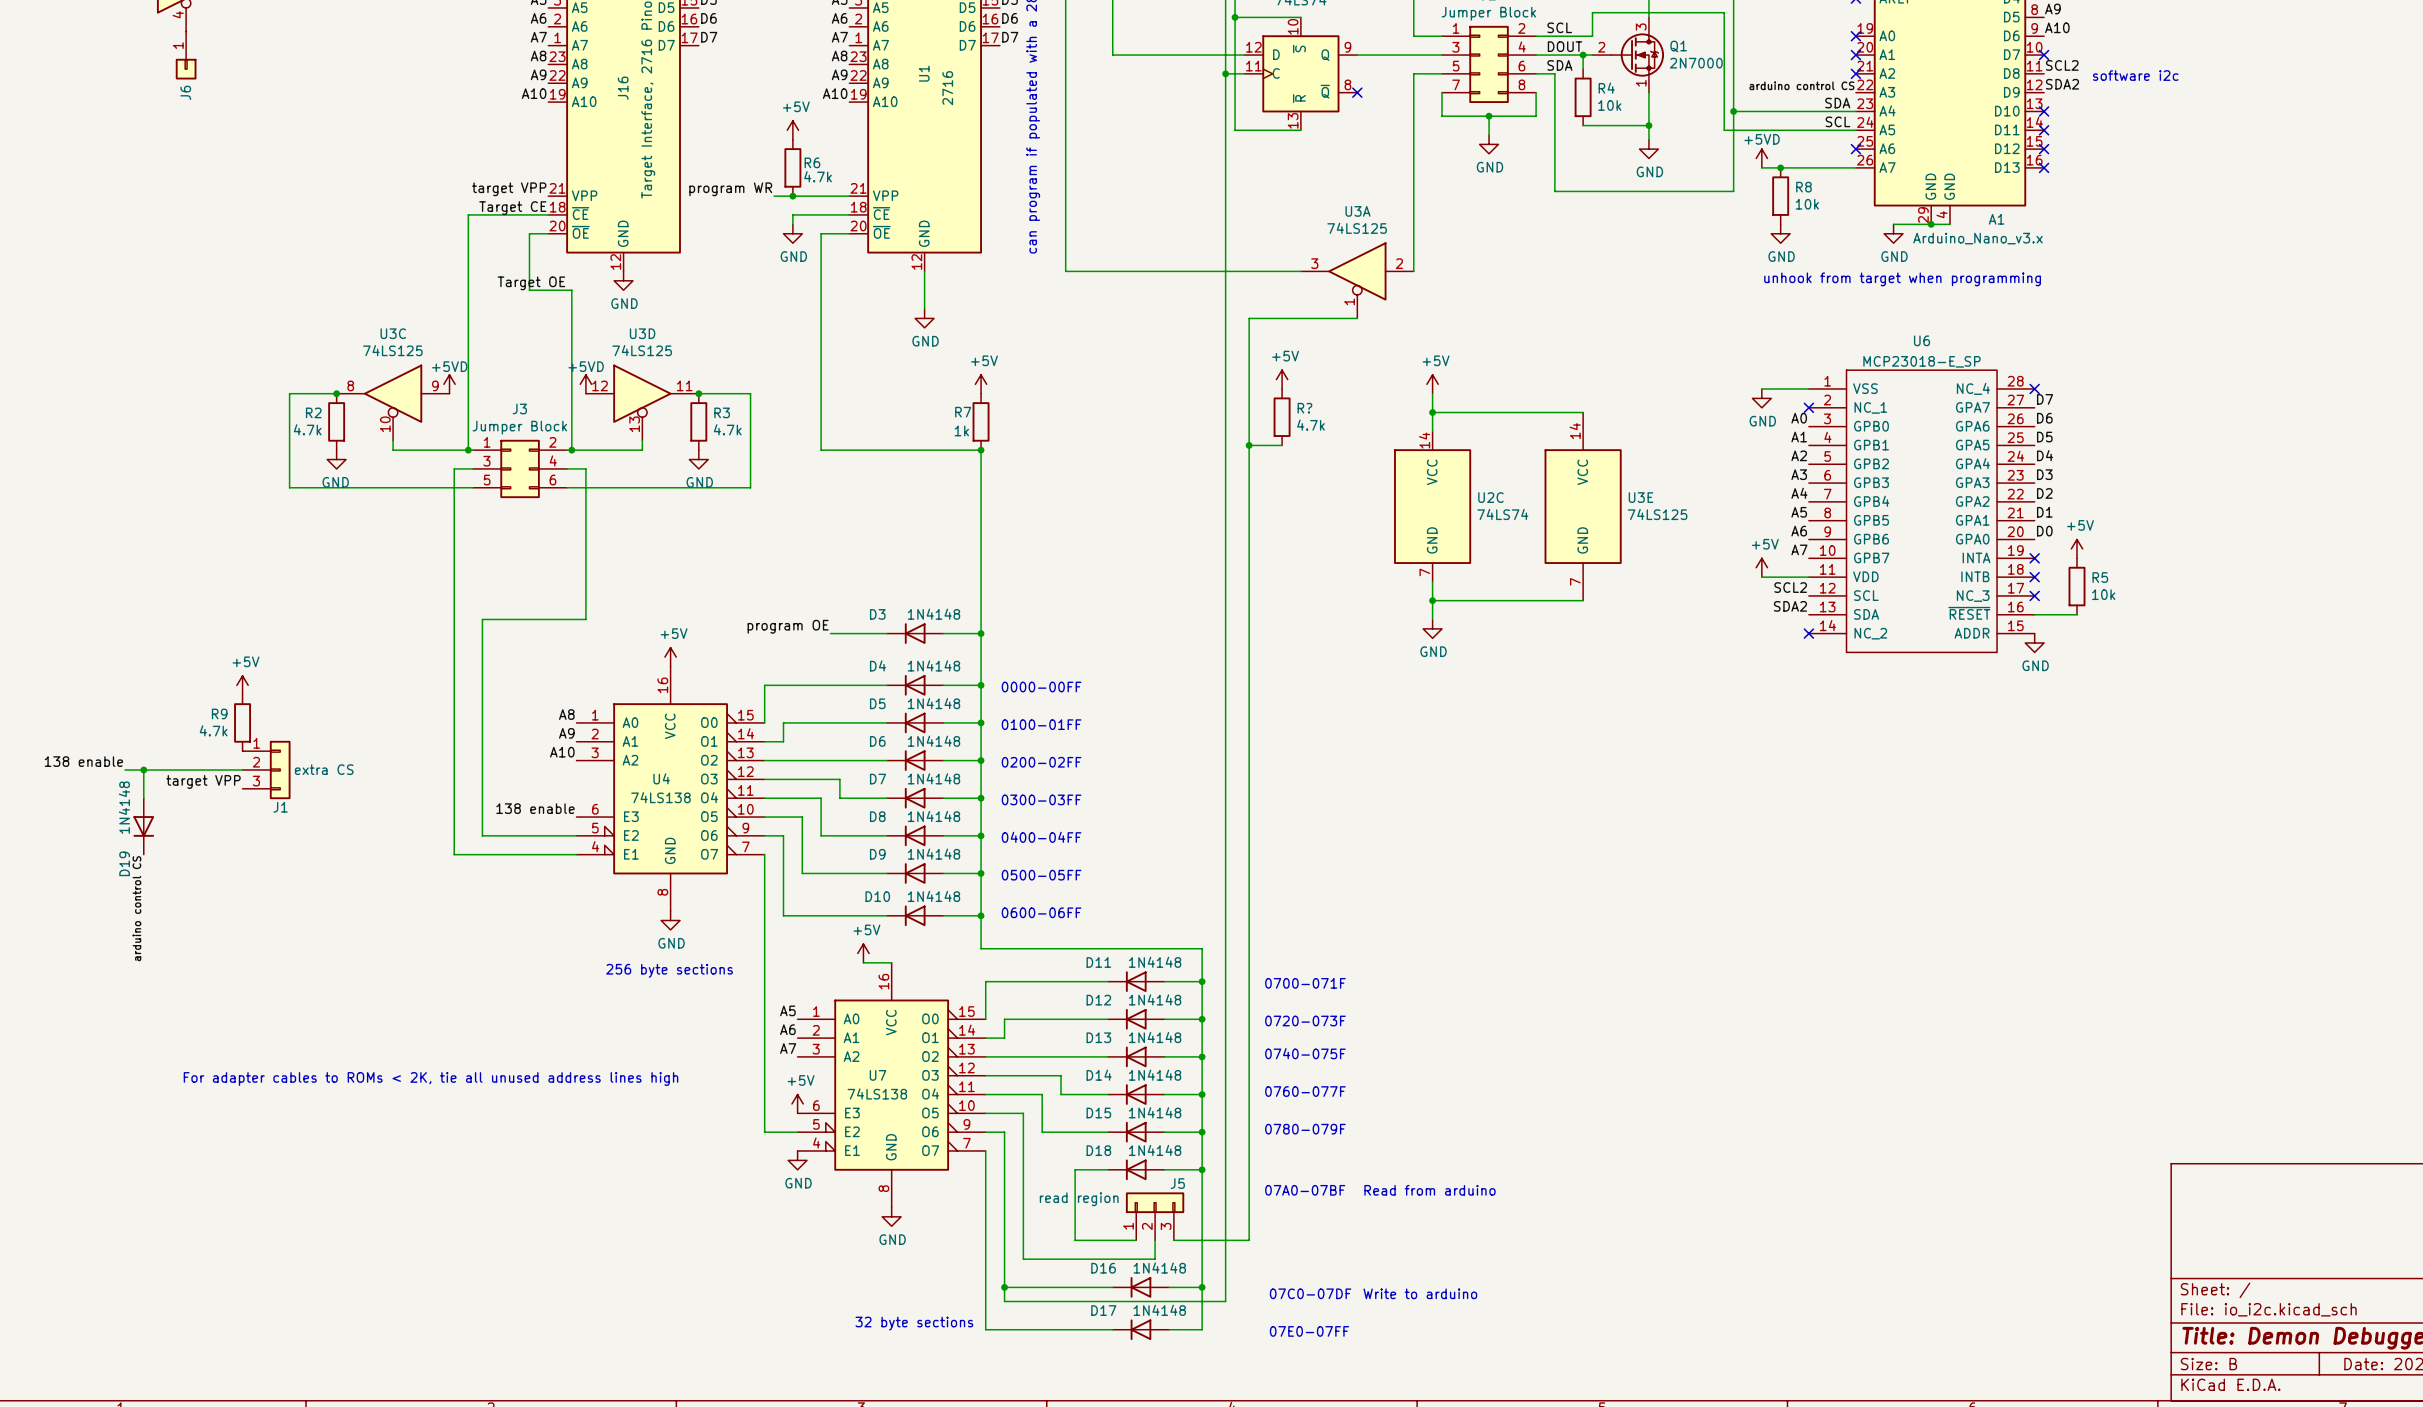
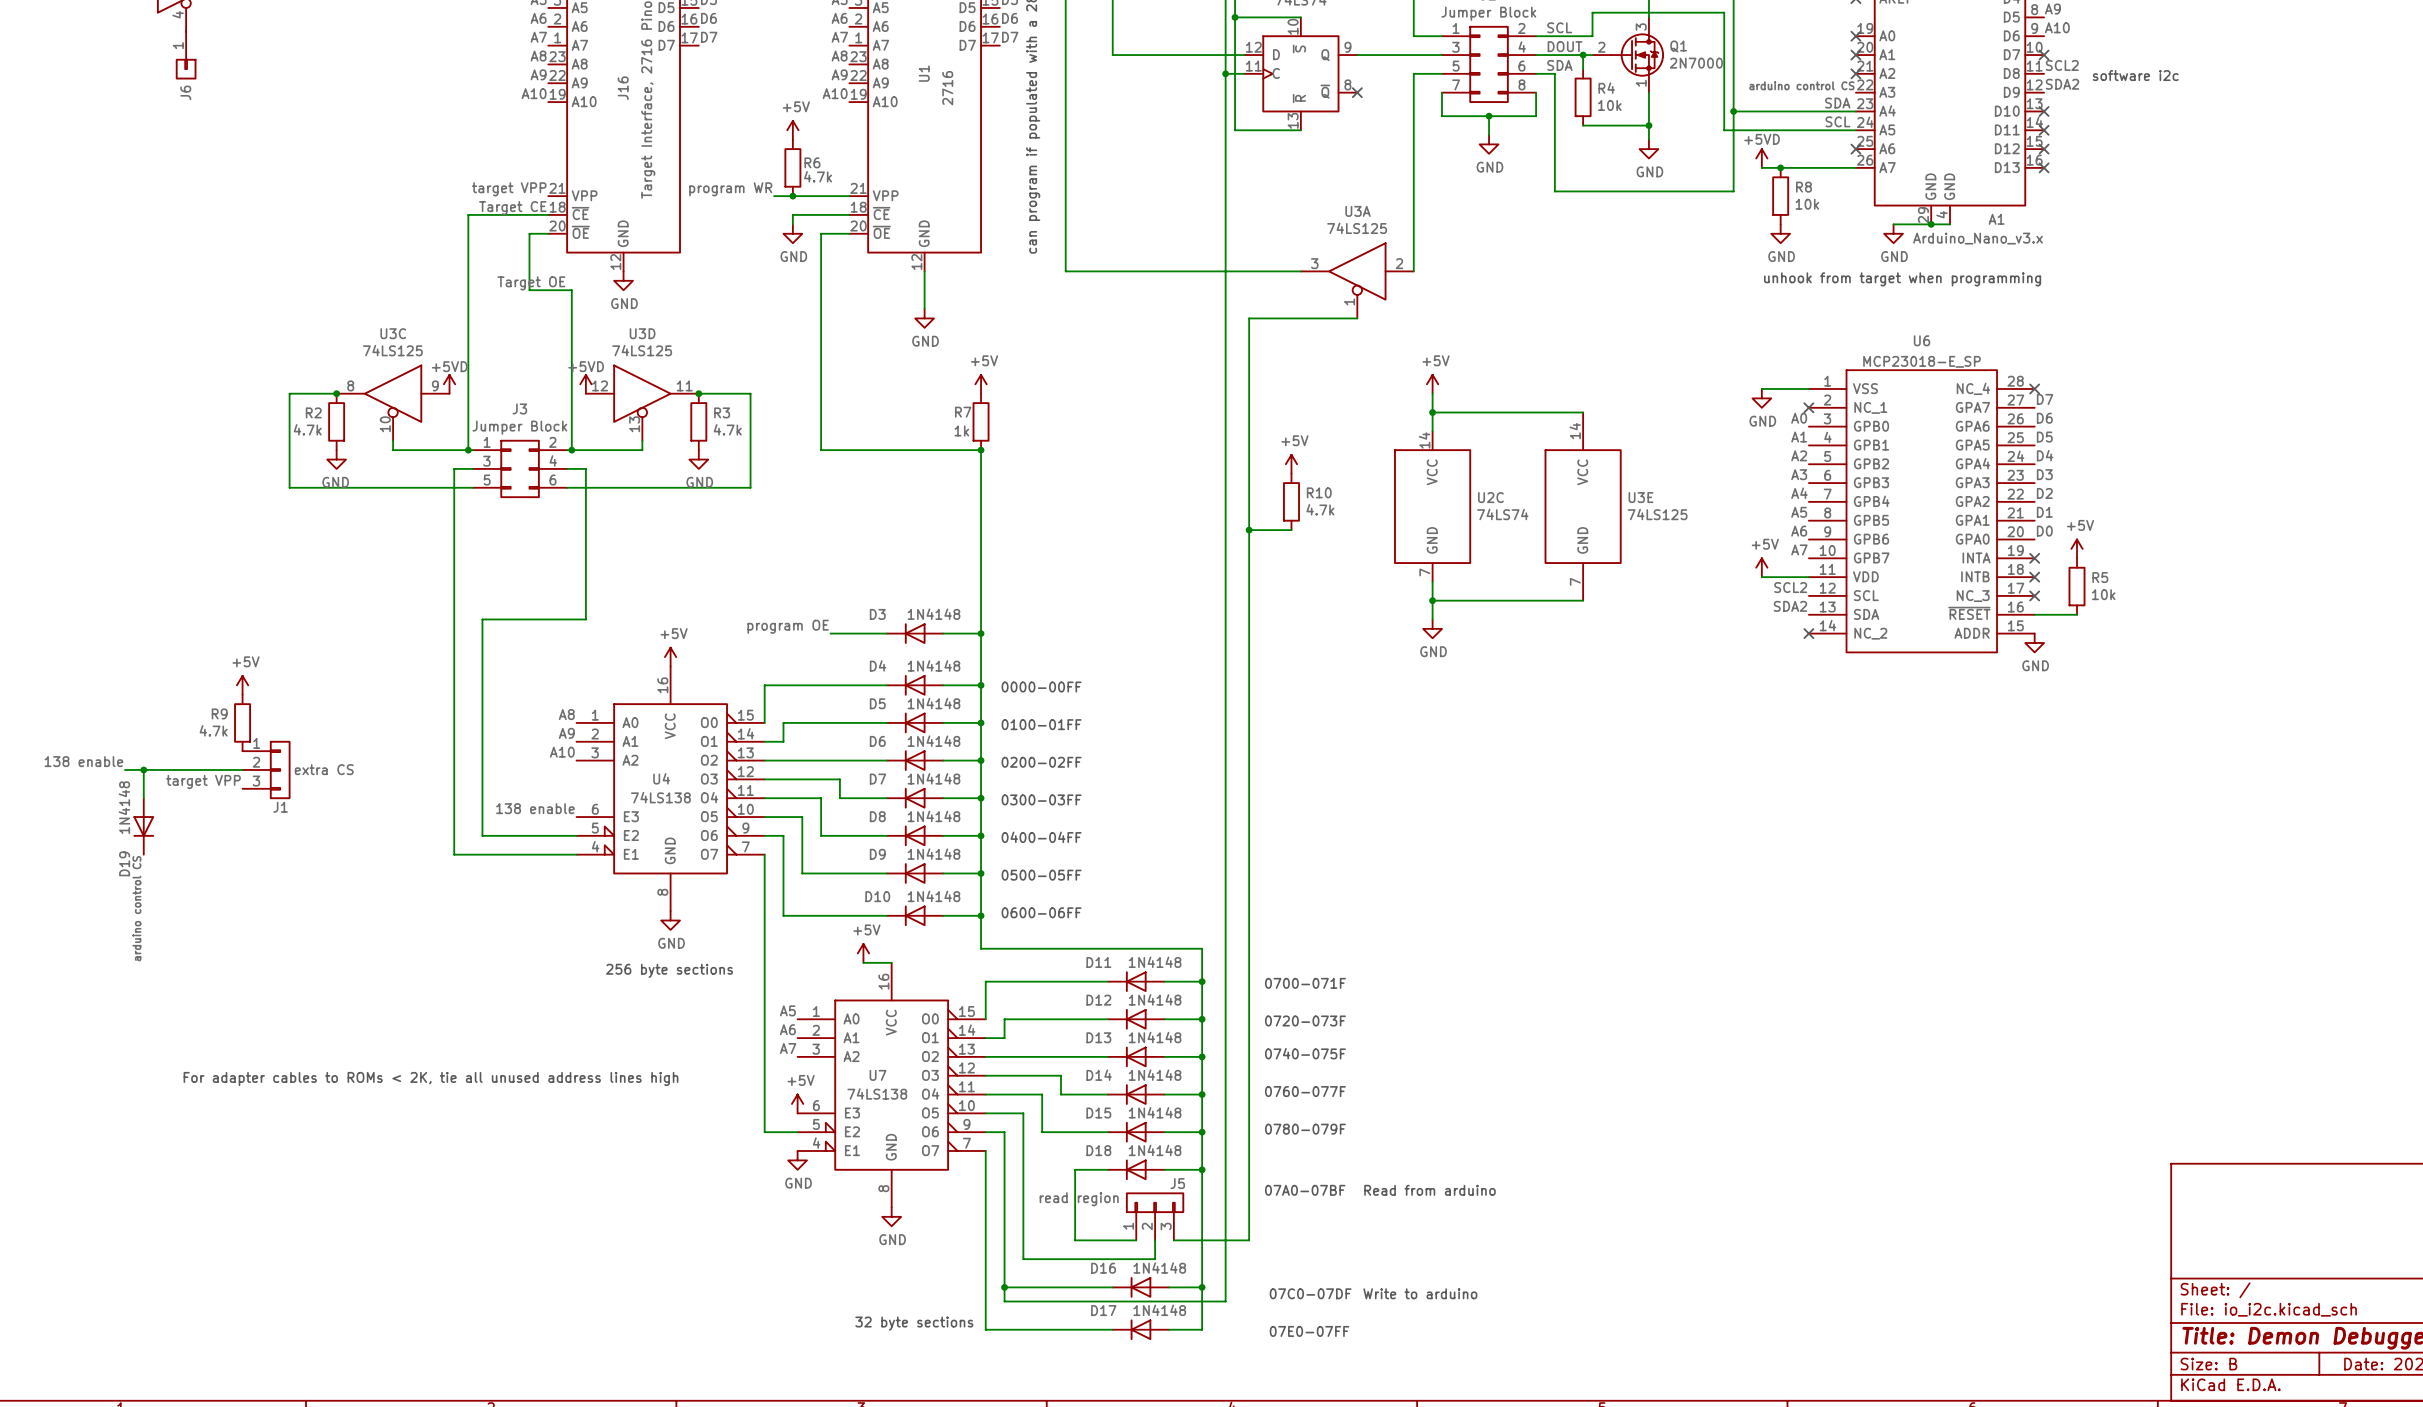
power symbol position: +5V (1282, 379) -> +5V (1291, 464)
R?: 4.7k (1282, 417) -> none
wire: (1249, 445) (1282, 445) -> none
junction: (1249, 445) -> none
R10: none -> 4.7k (1291, 501)
wire: none -> (1249, 530) (1291, 530)
junction: none -> (1249, 530)

